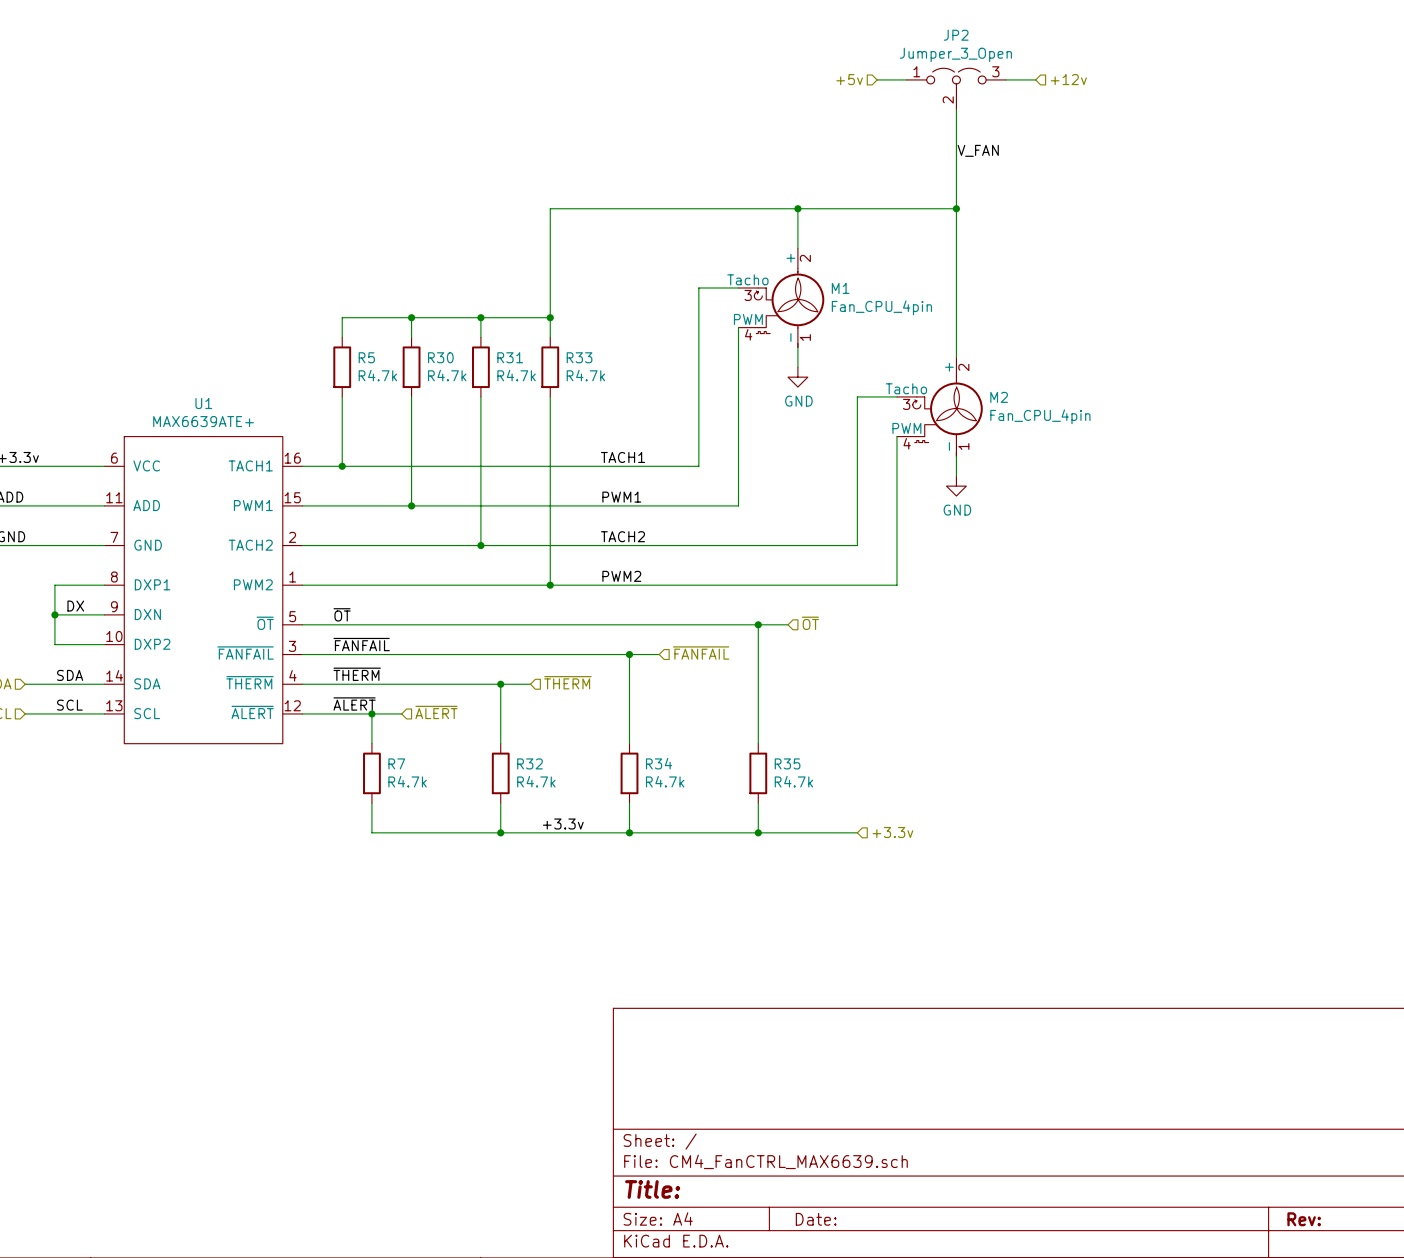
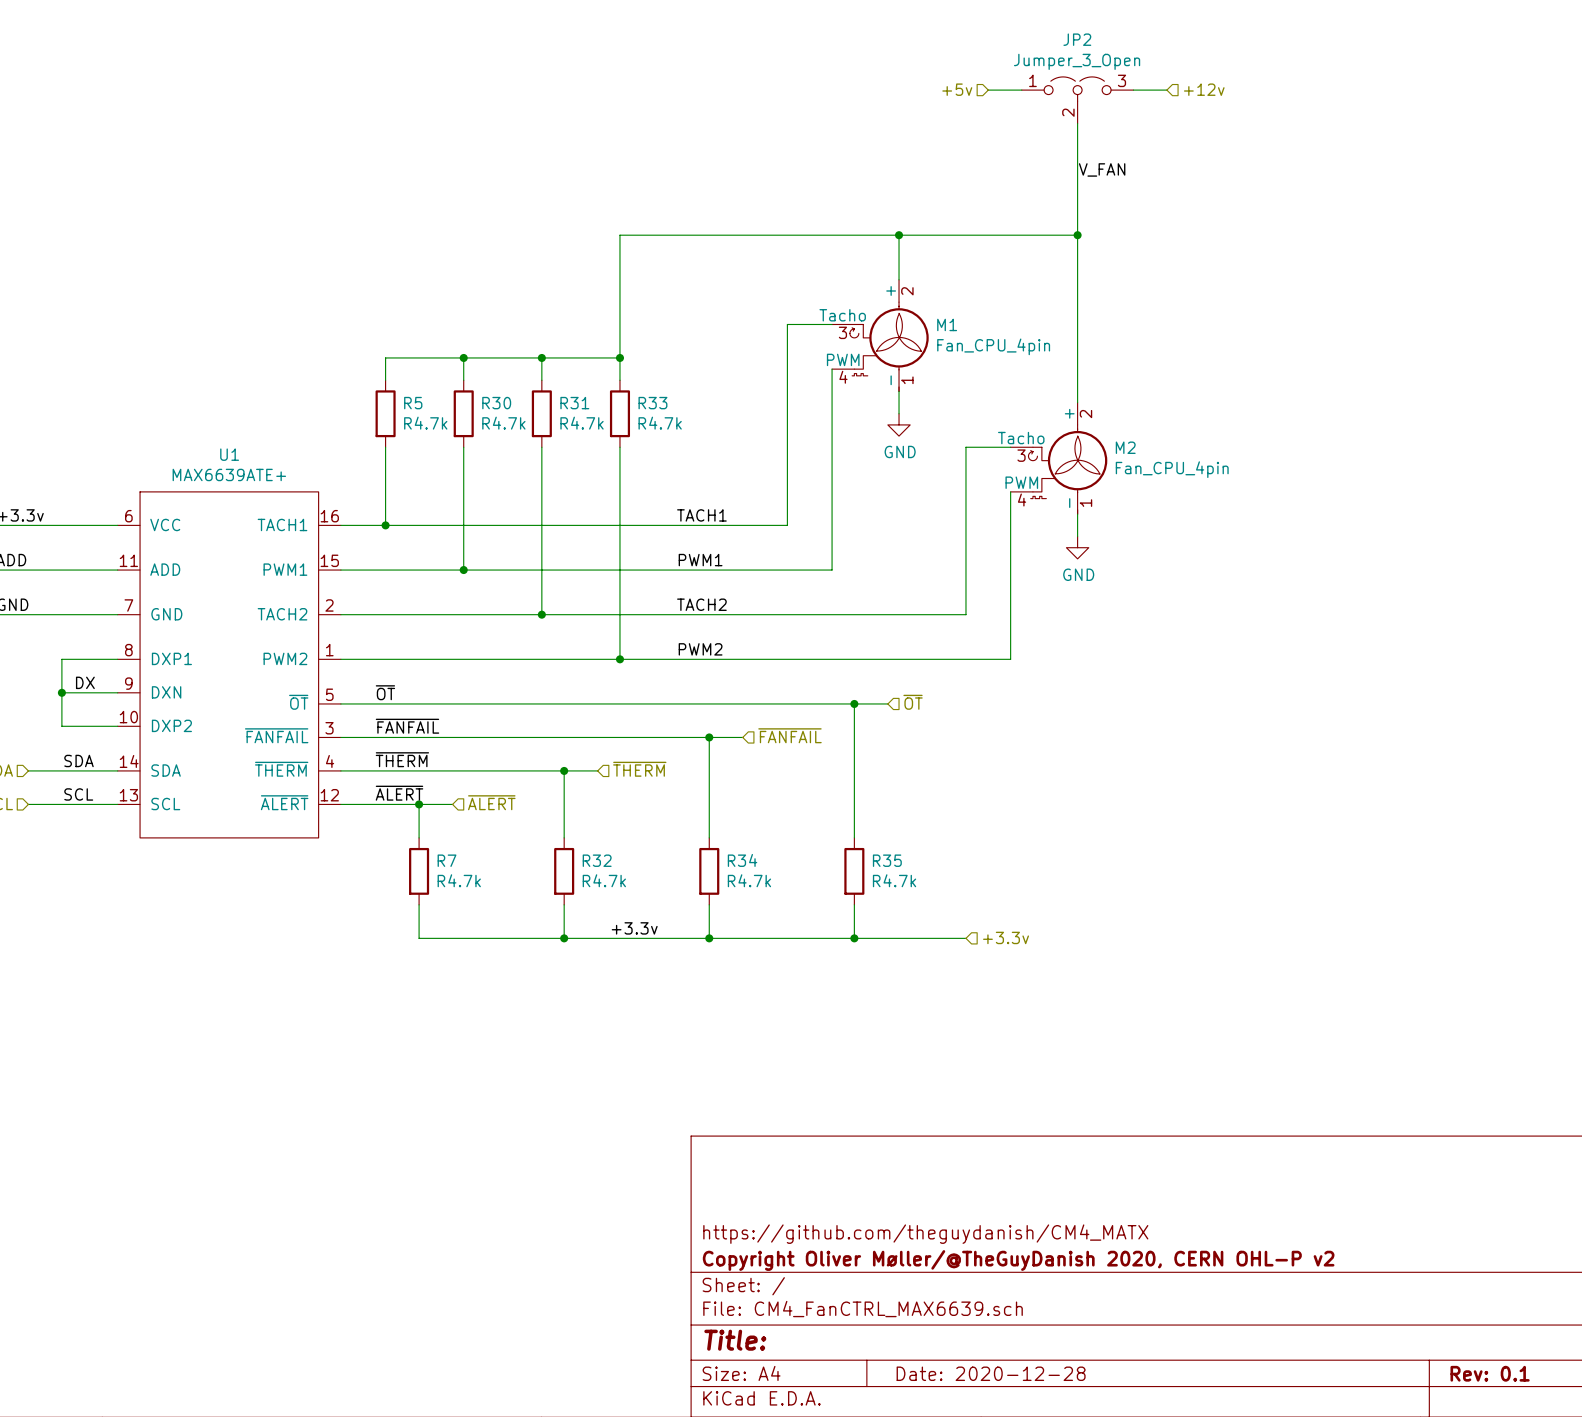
title block: none -> https://github.com/theguydanish/CM4_MATX (925, 1234)
title block: none -> Copyright Oliver Møller/@TheGuyDanish 2020, CERN OHL-P v2 (1018, 1260)
title block: Date: (816, 1219) -> Date: 2020-12-28 (991, 1373)
title block: Rev: (1304, 1219) -> Rev: 0.1 (1490, 1373)

